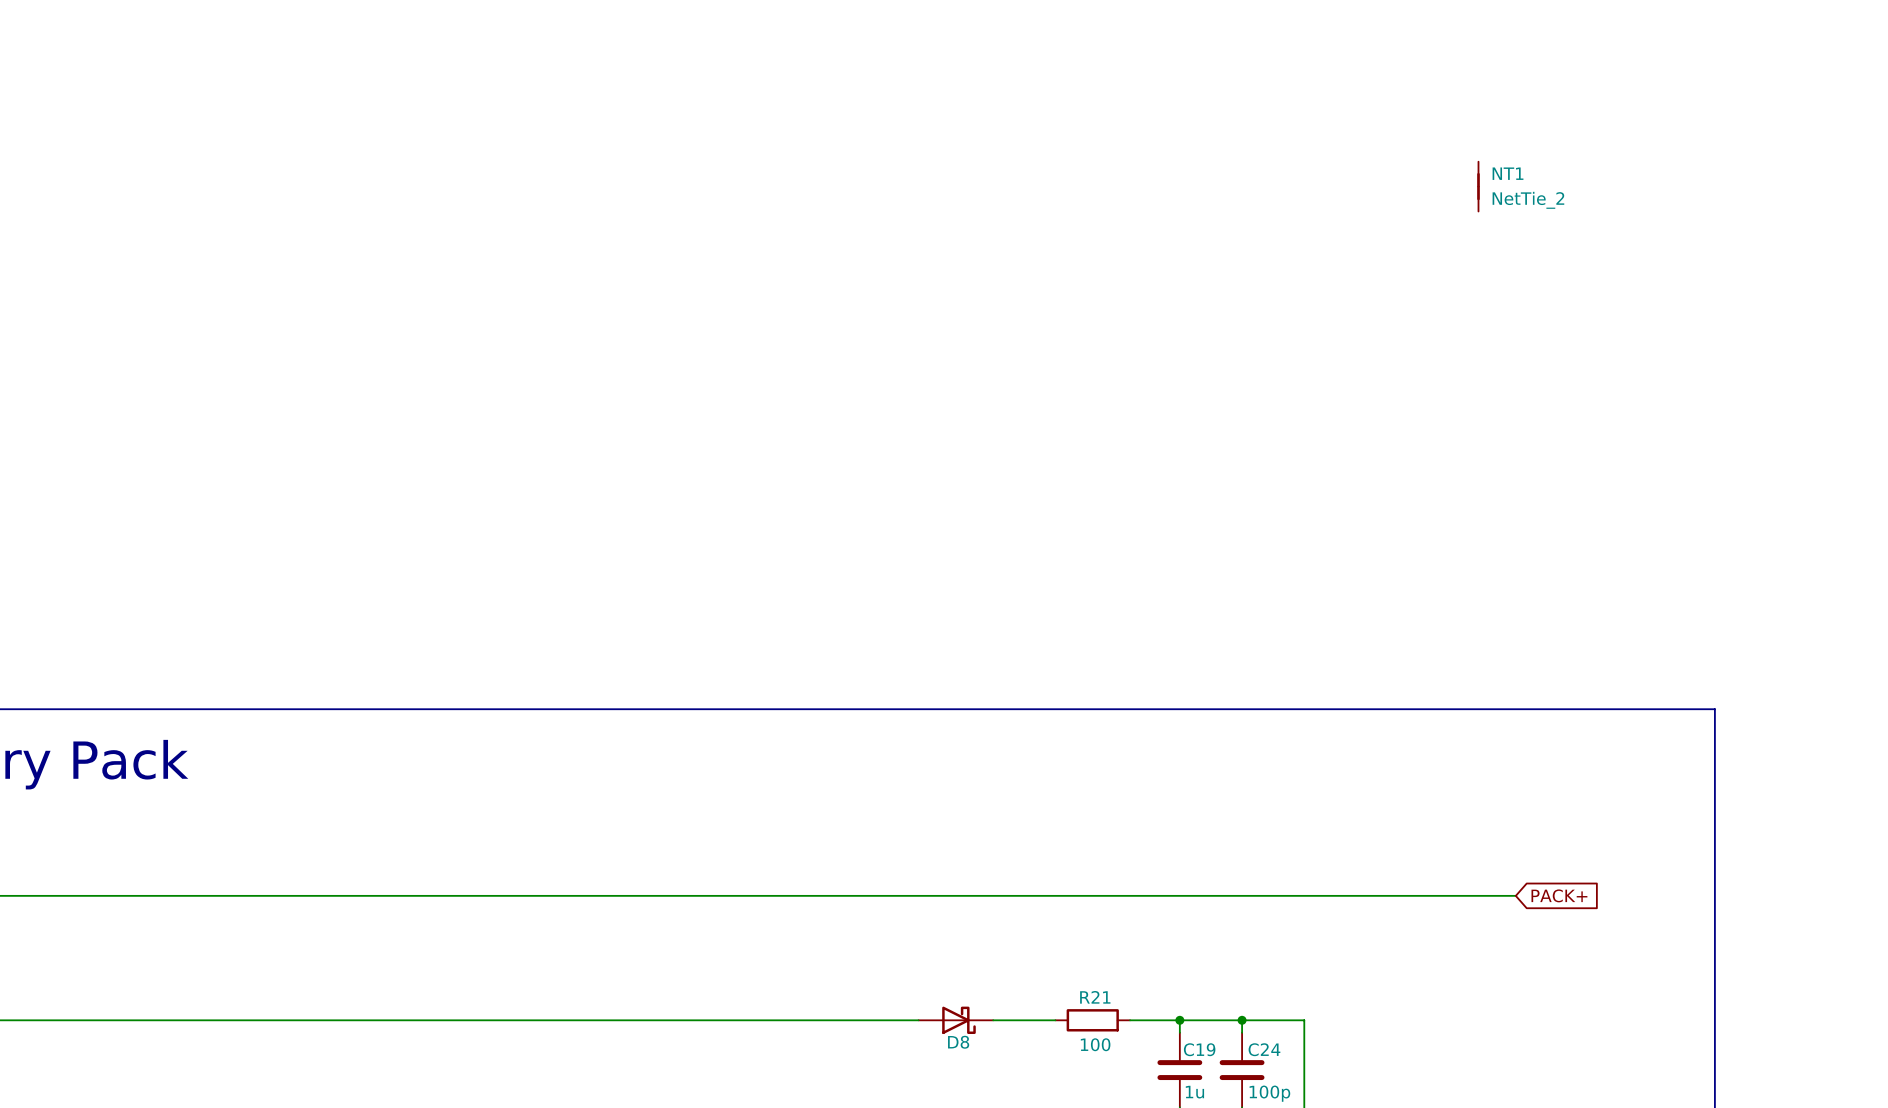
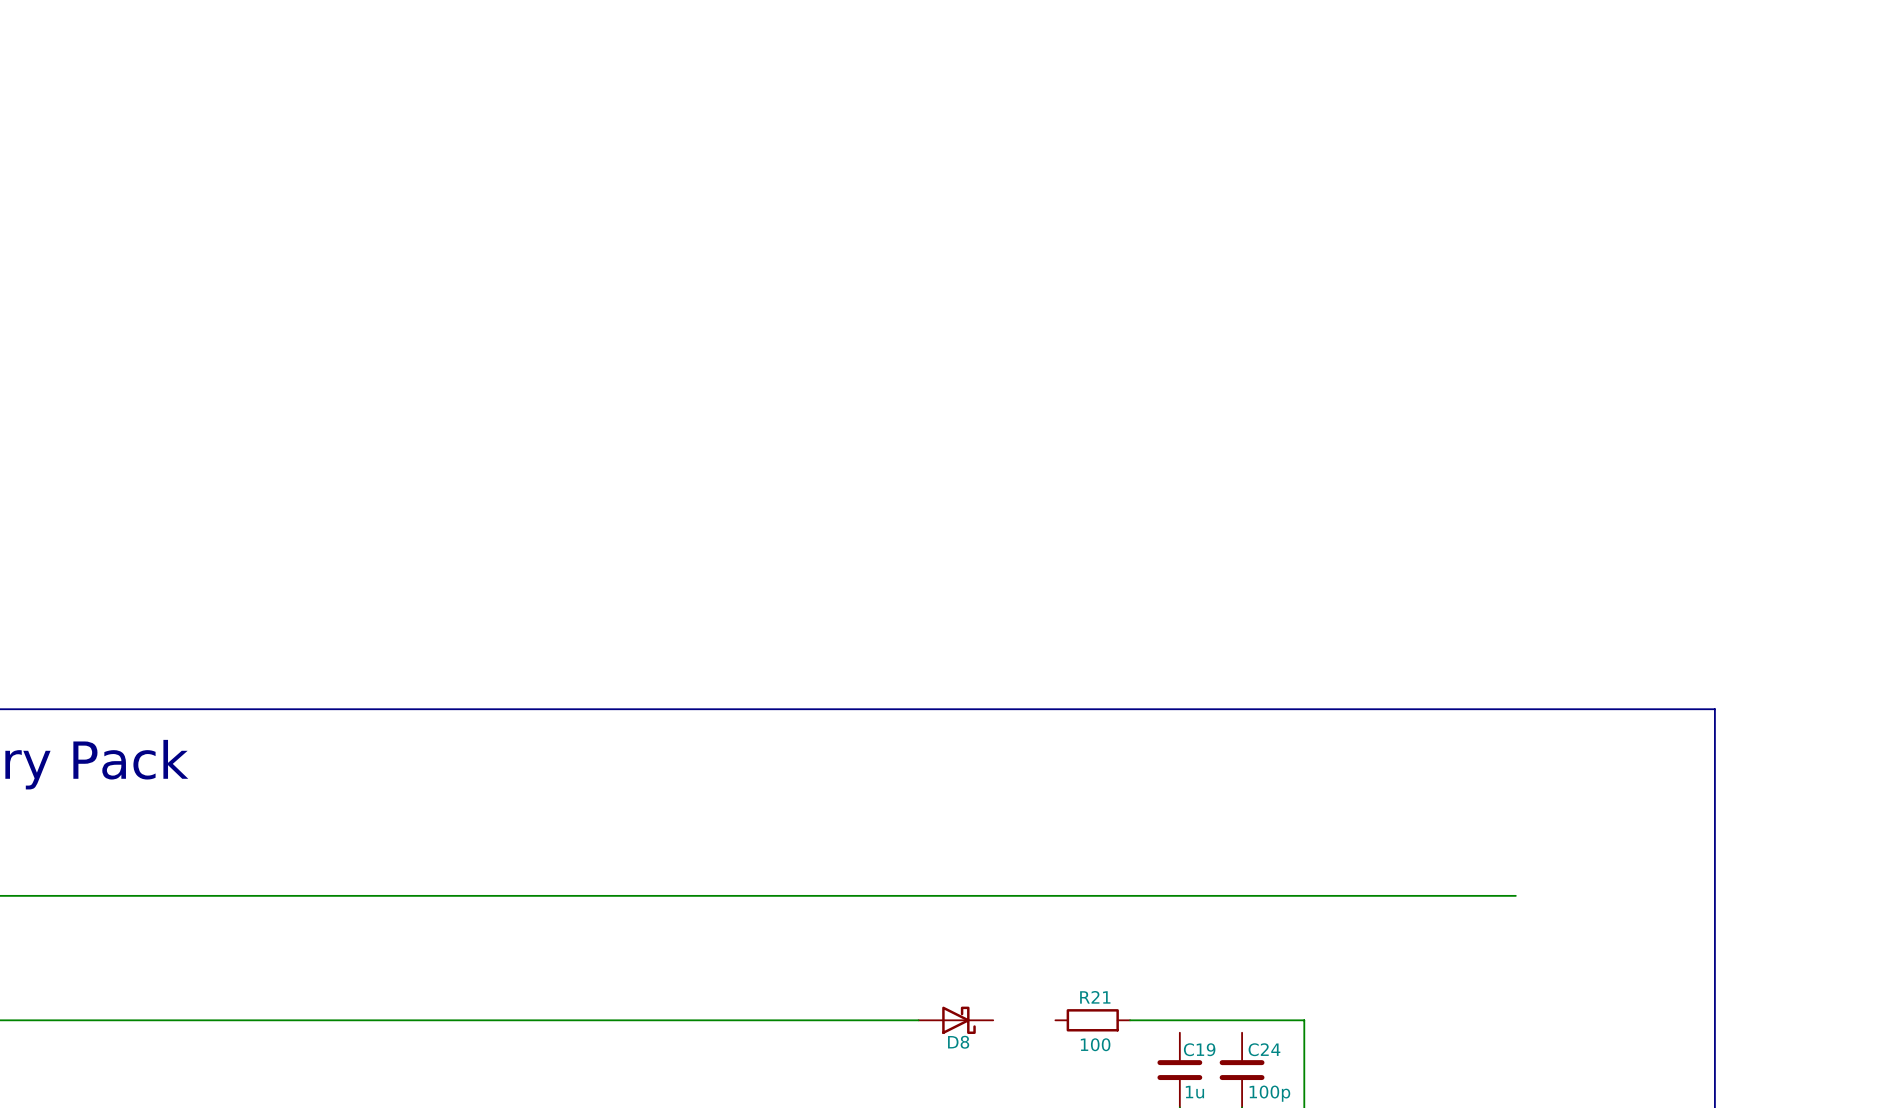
NT1: NetTie_2 (1478, 186) -> none
global label: PACK+ (1559, 895) -> none
wire: (993, 1020) (1055, 1020) -> none
wire: (1179, 1020) (1179, 1032) -> none
junction: (1179, 1020) -> none
wire: (1242, 1020) (1242, 1032) -> none
junction: (1242, 1020) -> none

